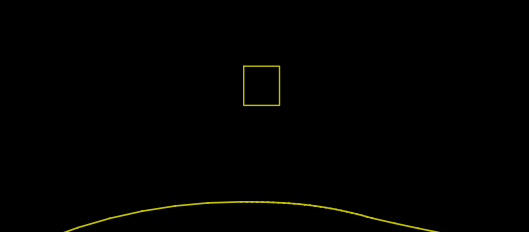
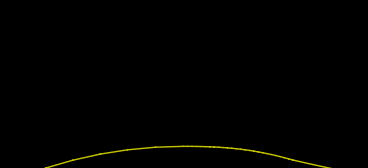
part: (261, 85) -> none

